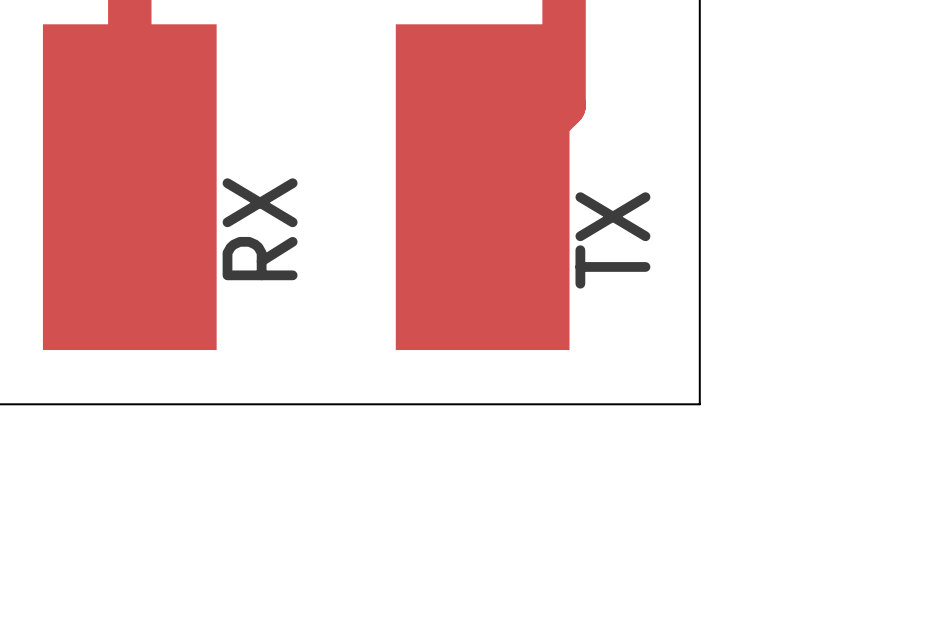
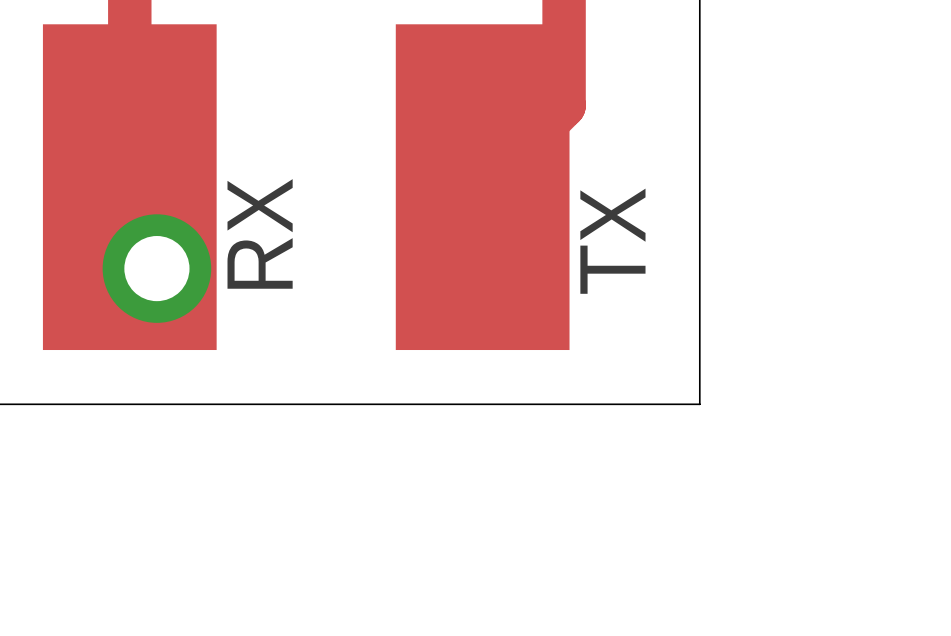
via: none -> (156, 268)

